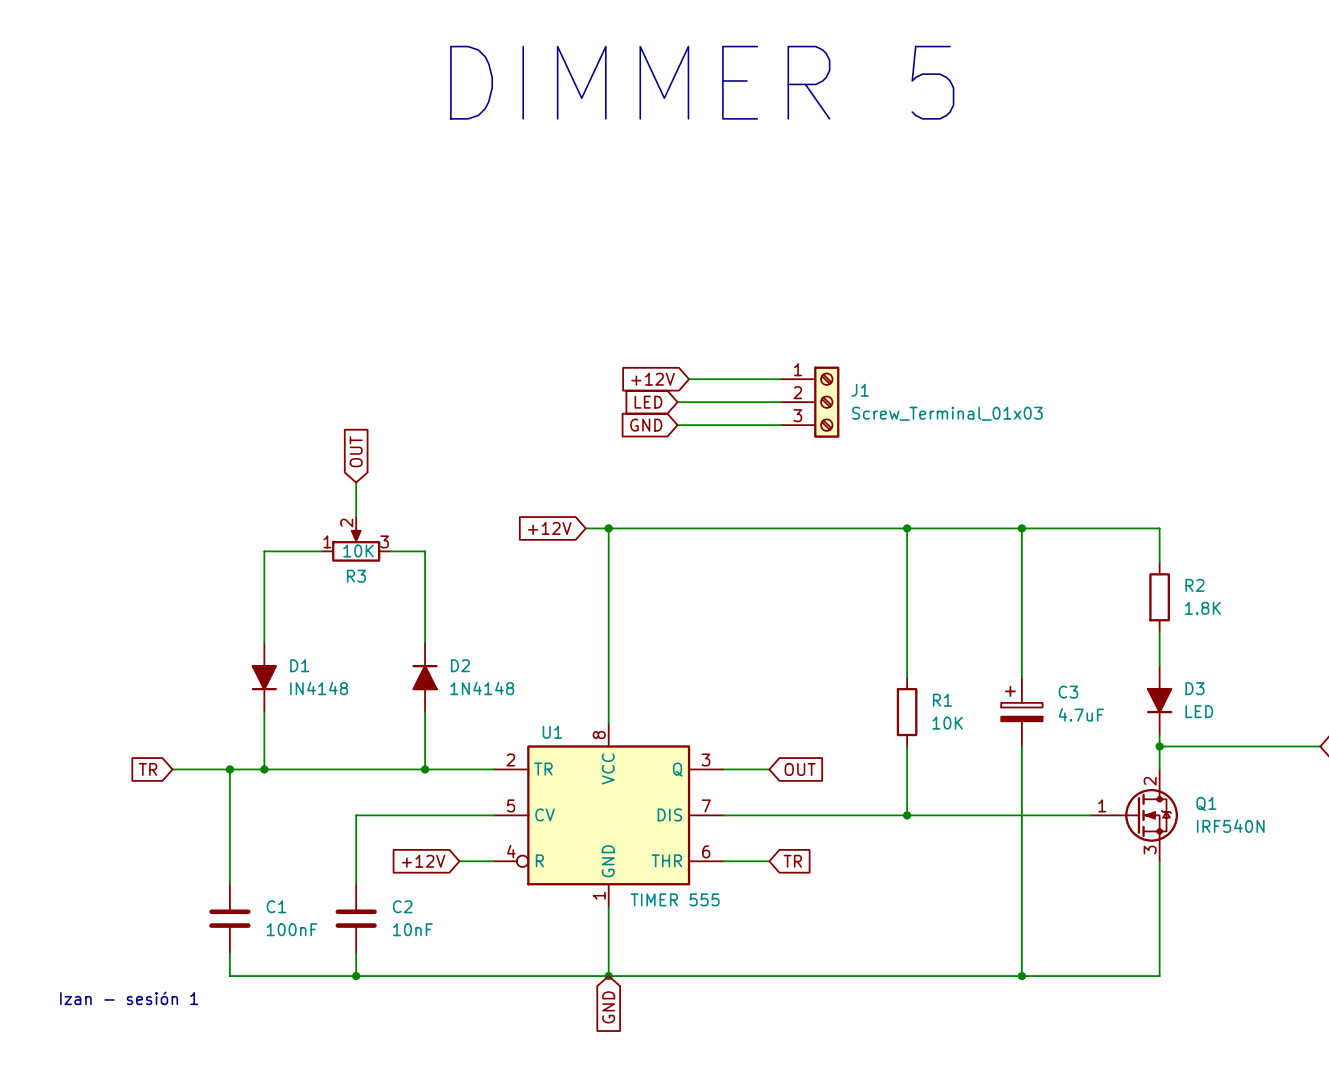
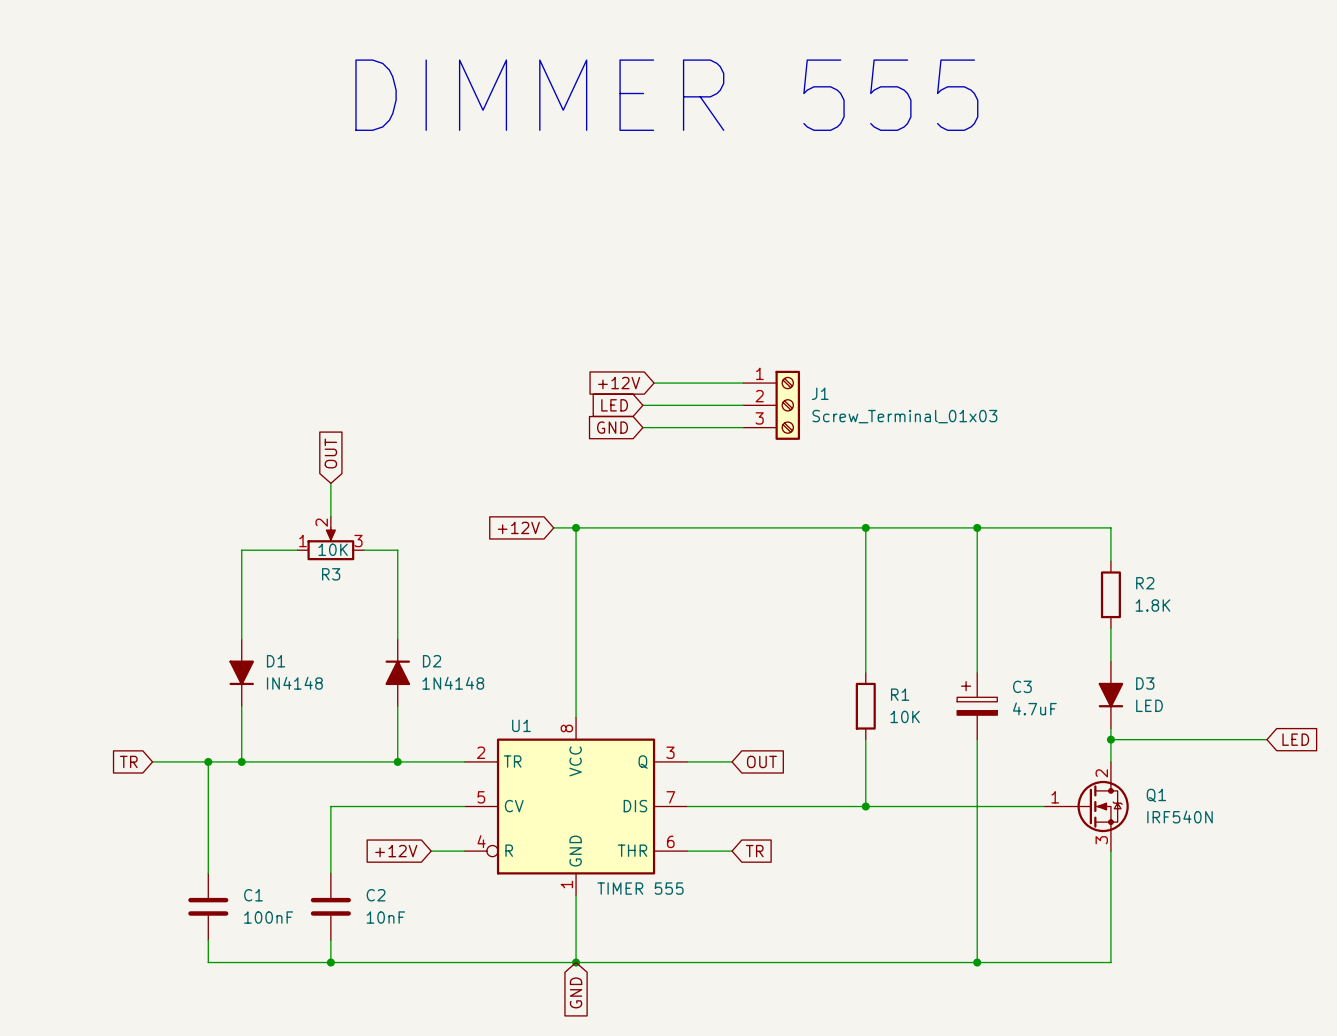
text: DIMMER 5 (702, 82) -> DIMMER 555 (666, 95)
text: Izan - sesión 1 (129, 998) -> none

